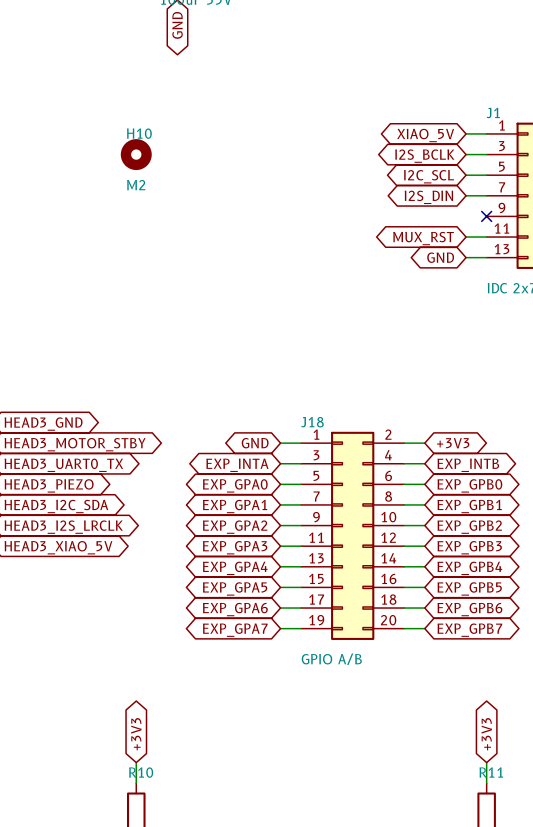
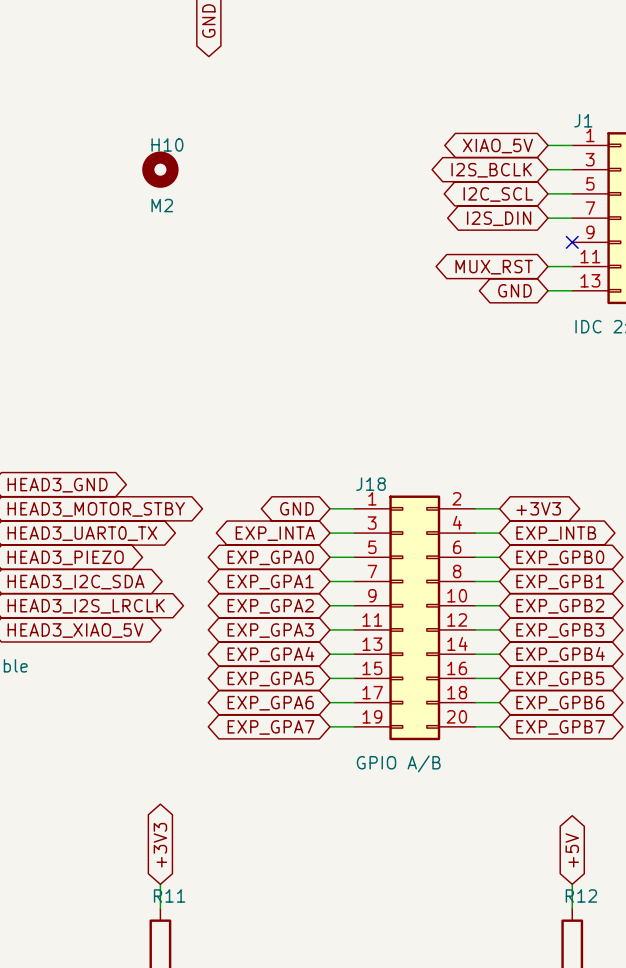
global label: +3V3 (486, 734) -> +5V (572, 850)
R10 name: R10 (141, 772) -> R11 (169, 895)
R11 name: R11 (491, 772) -> R12 (581, 895)

